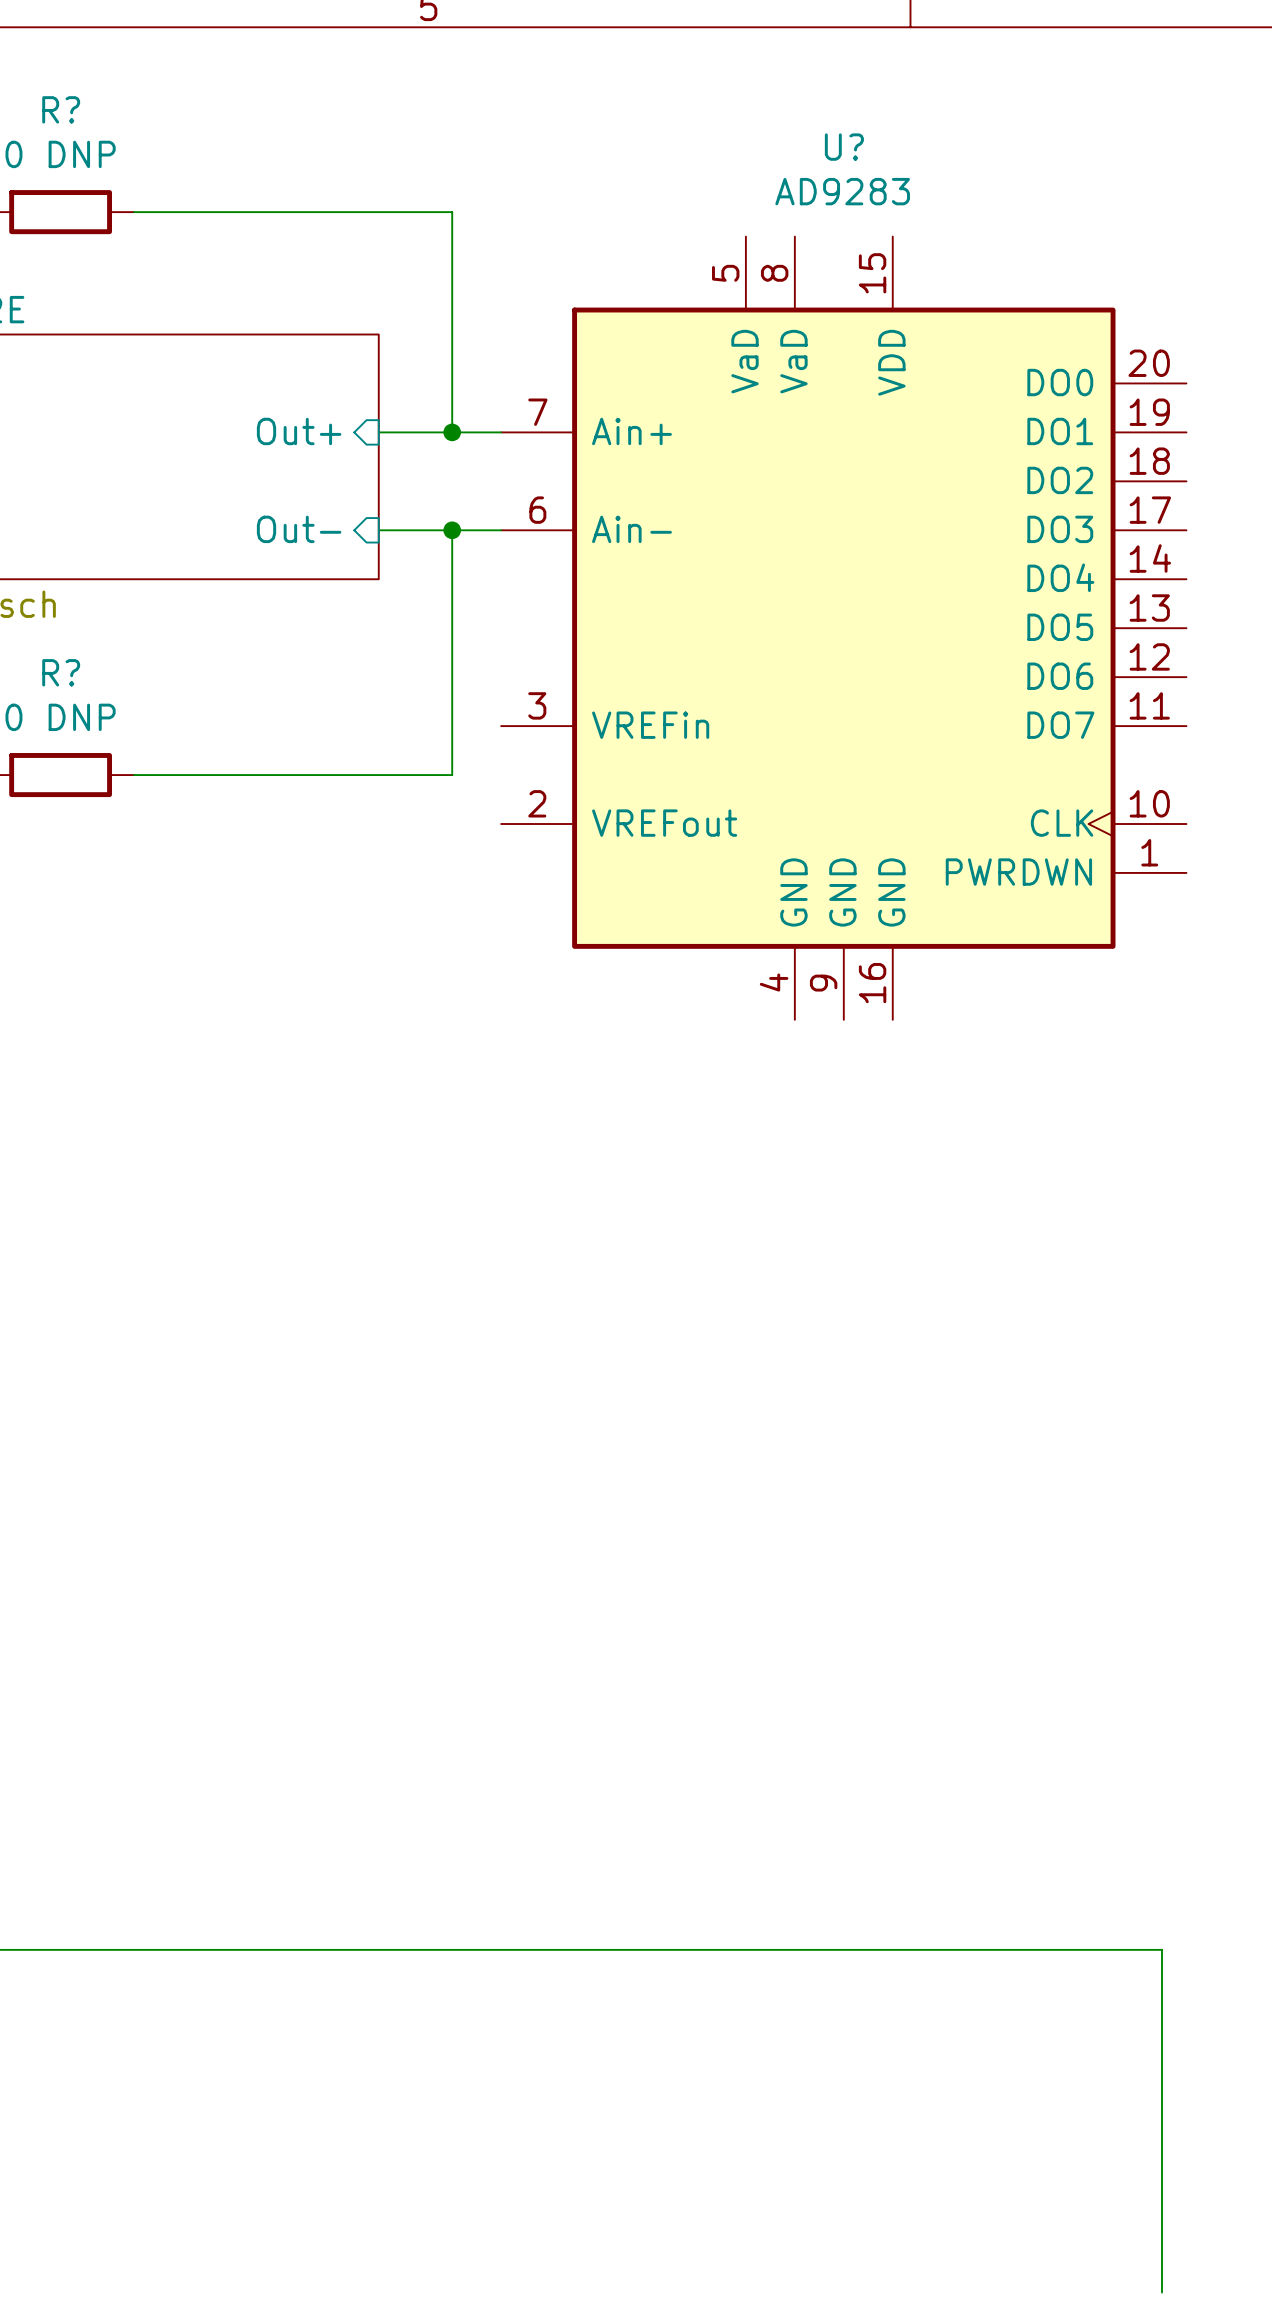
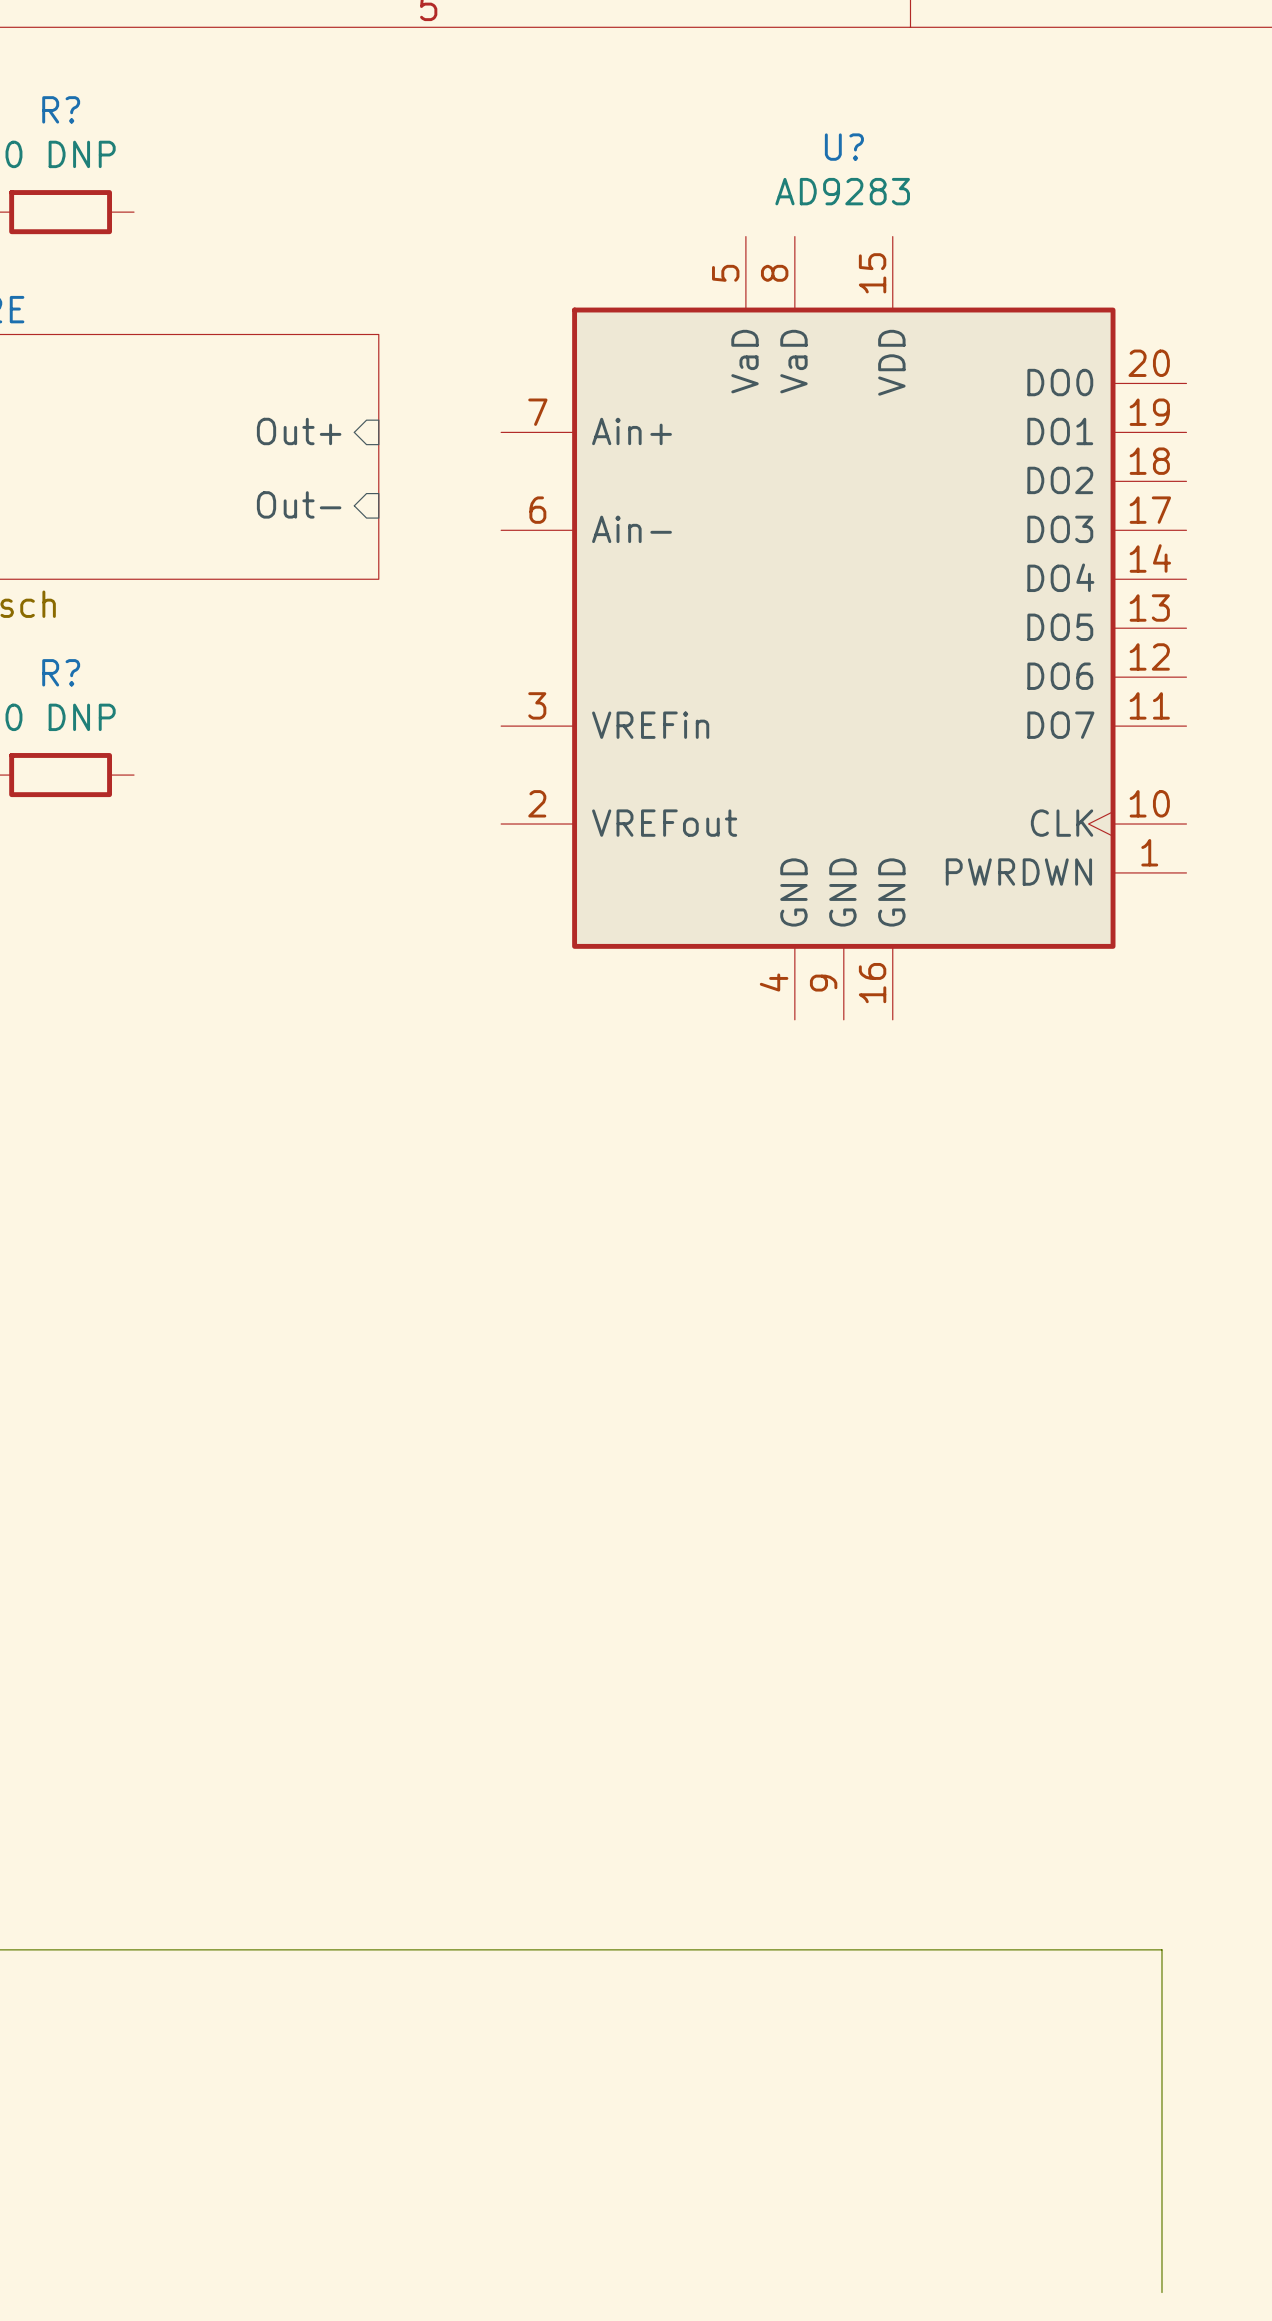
wire: (134, 212) (452, 212) (452, 432) -> none
wire: (378, 432) (501, 432) -> none
junction: (452, 432) -> none
sheet pin position: Out- (299, 529) -> Out- (299, 504)
wire: (378, 530) (501, 530) -> none
wire: (452, 530) (452, 775) (134, 775) -> none
junction: (452, 530) -> none

